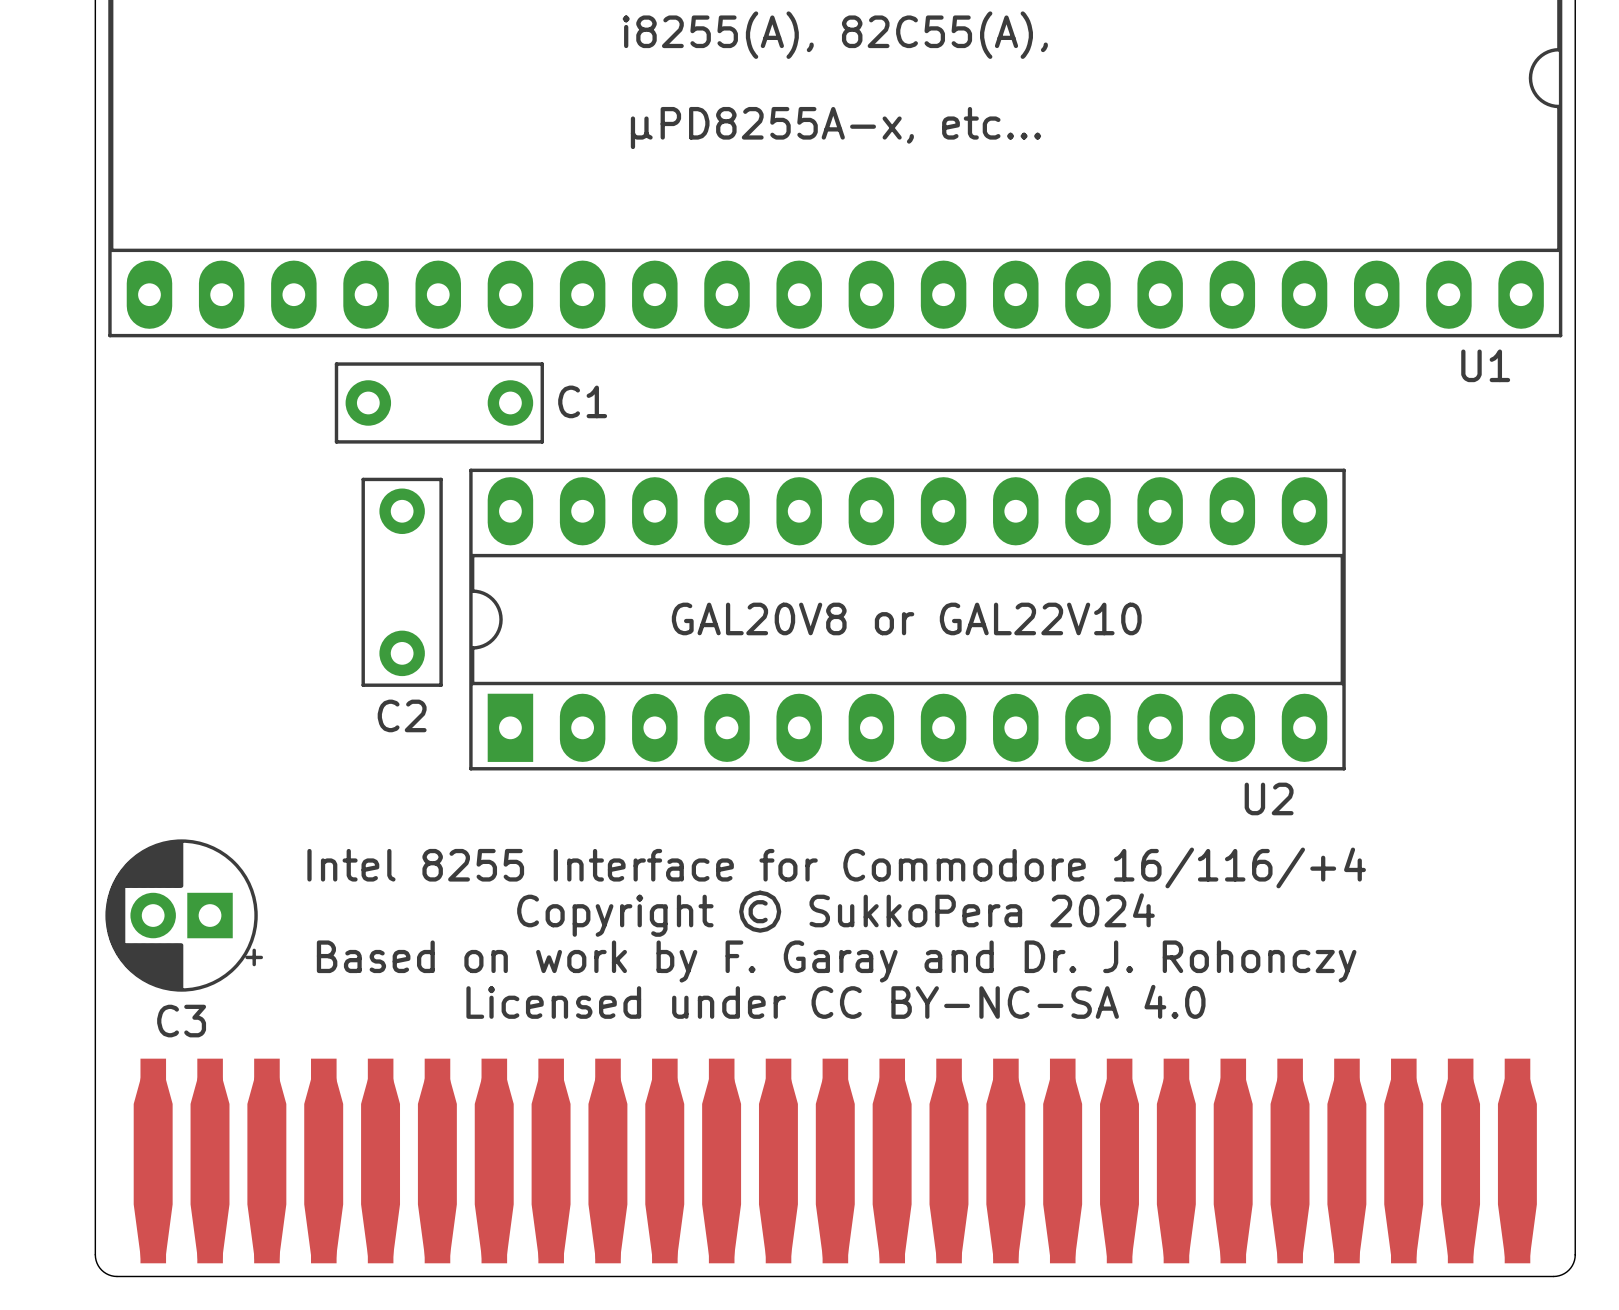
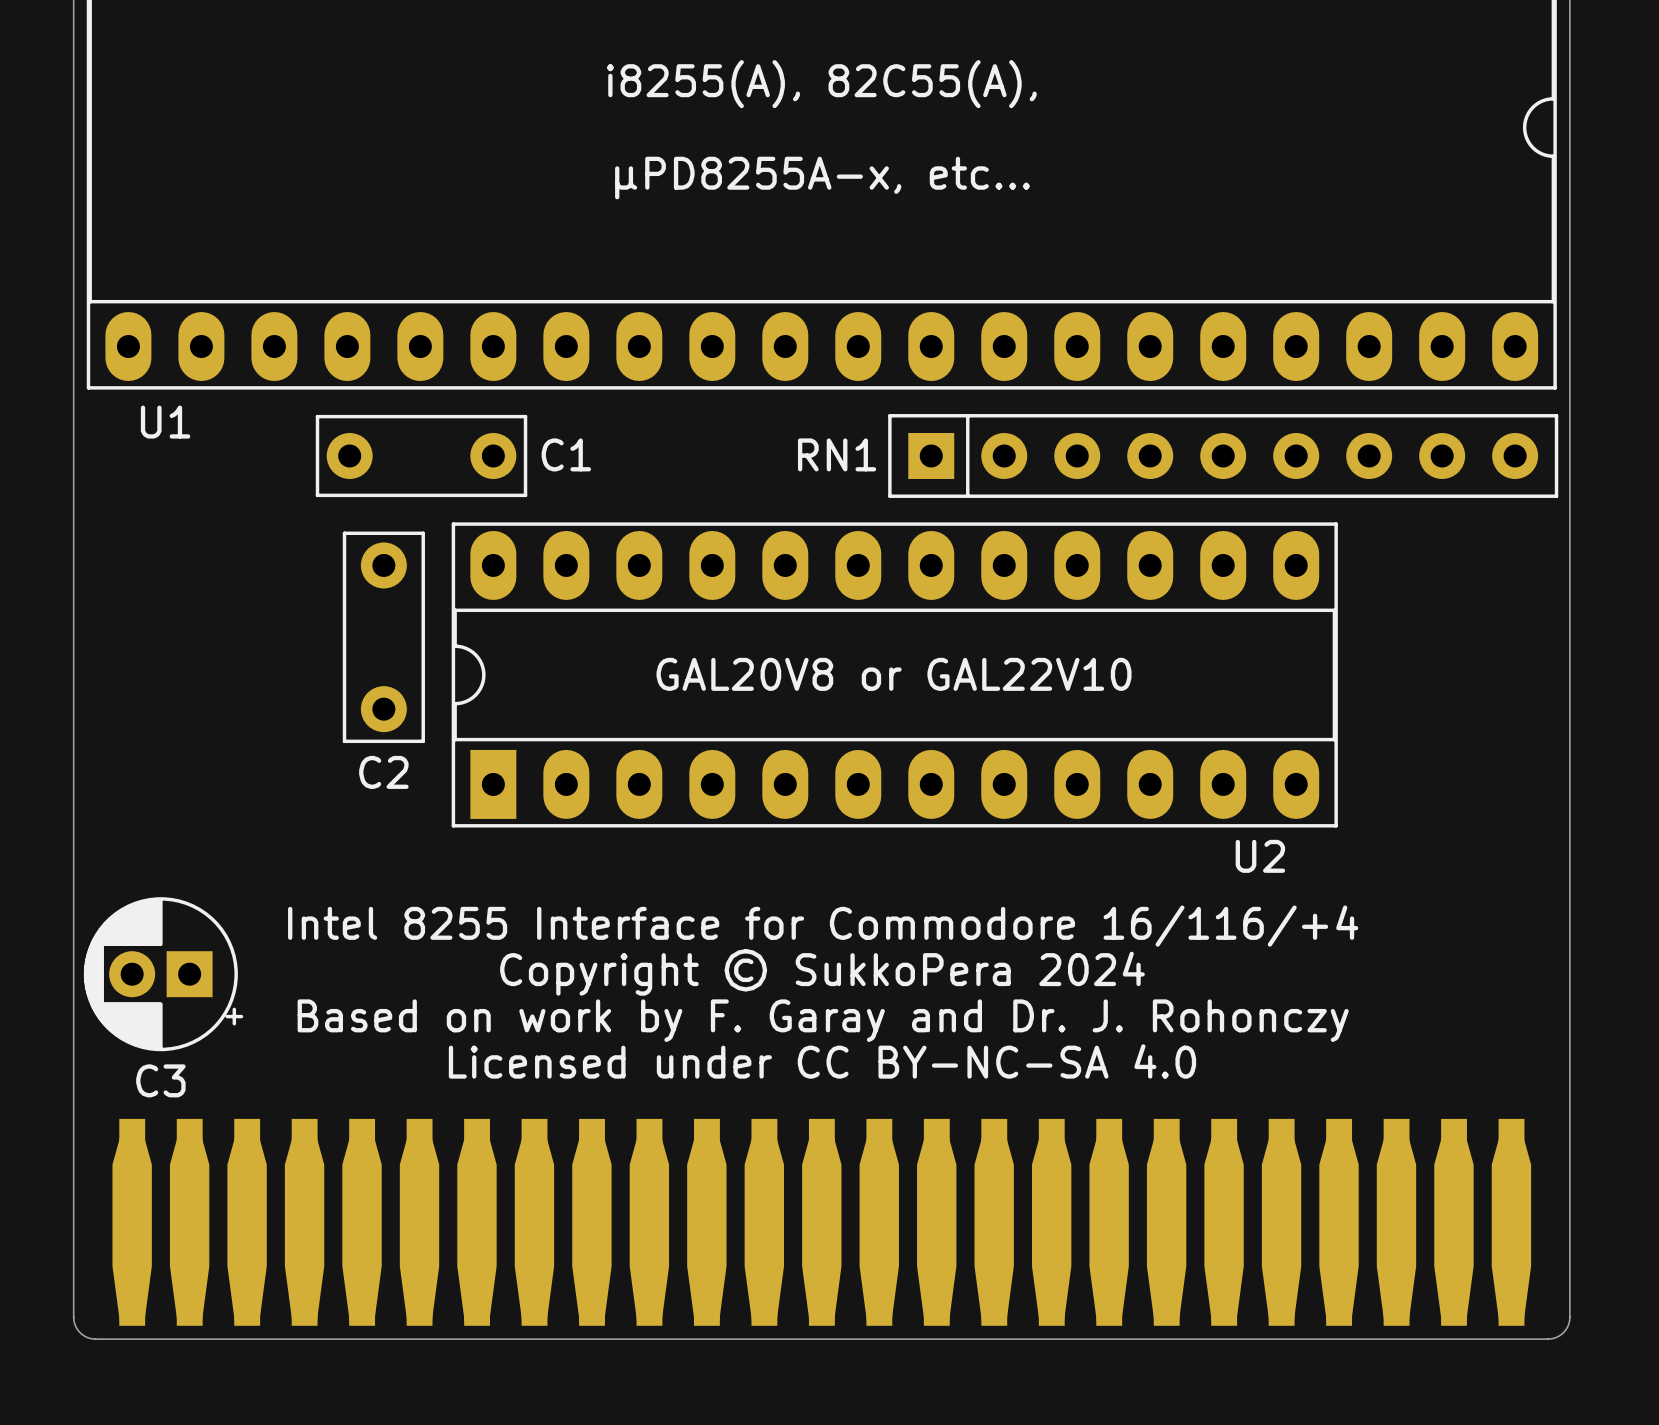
U1 name position: U1 (1485, 365) -> U1 (165, 422)
RN1: none -> (1223, 455)

